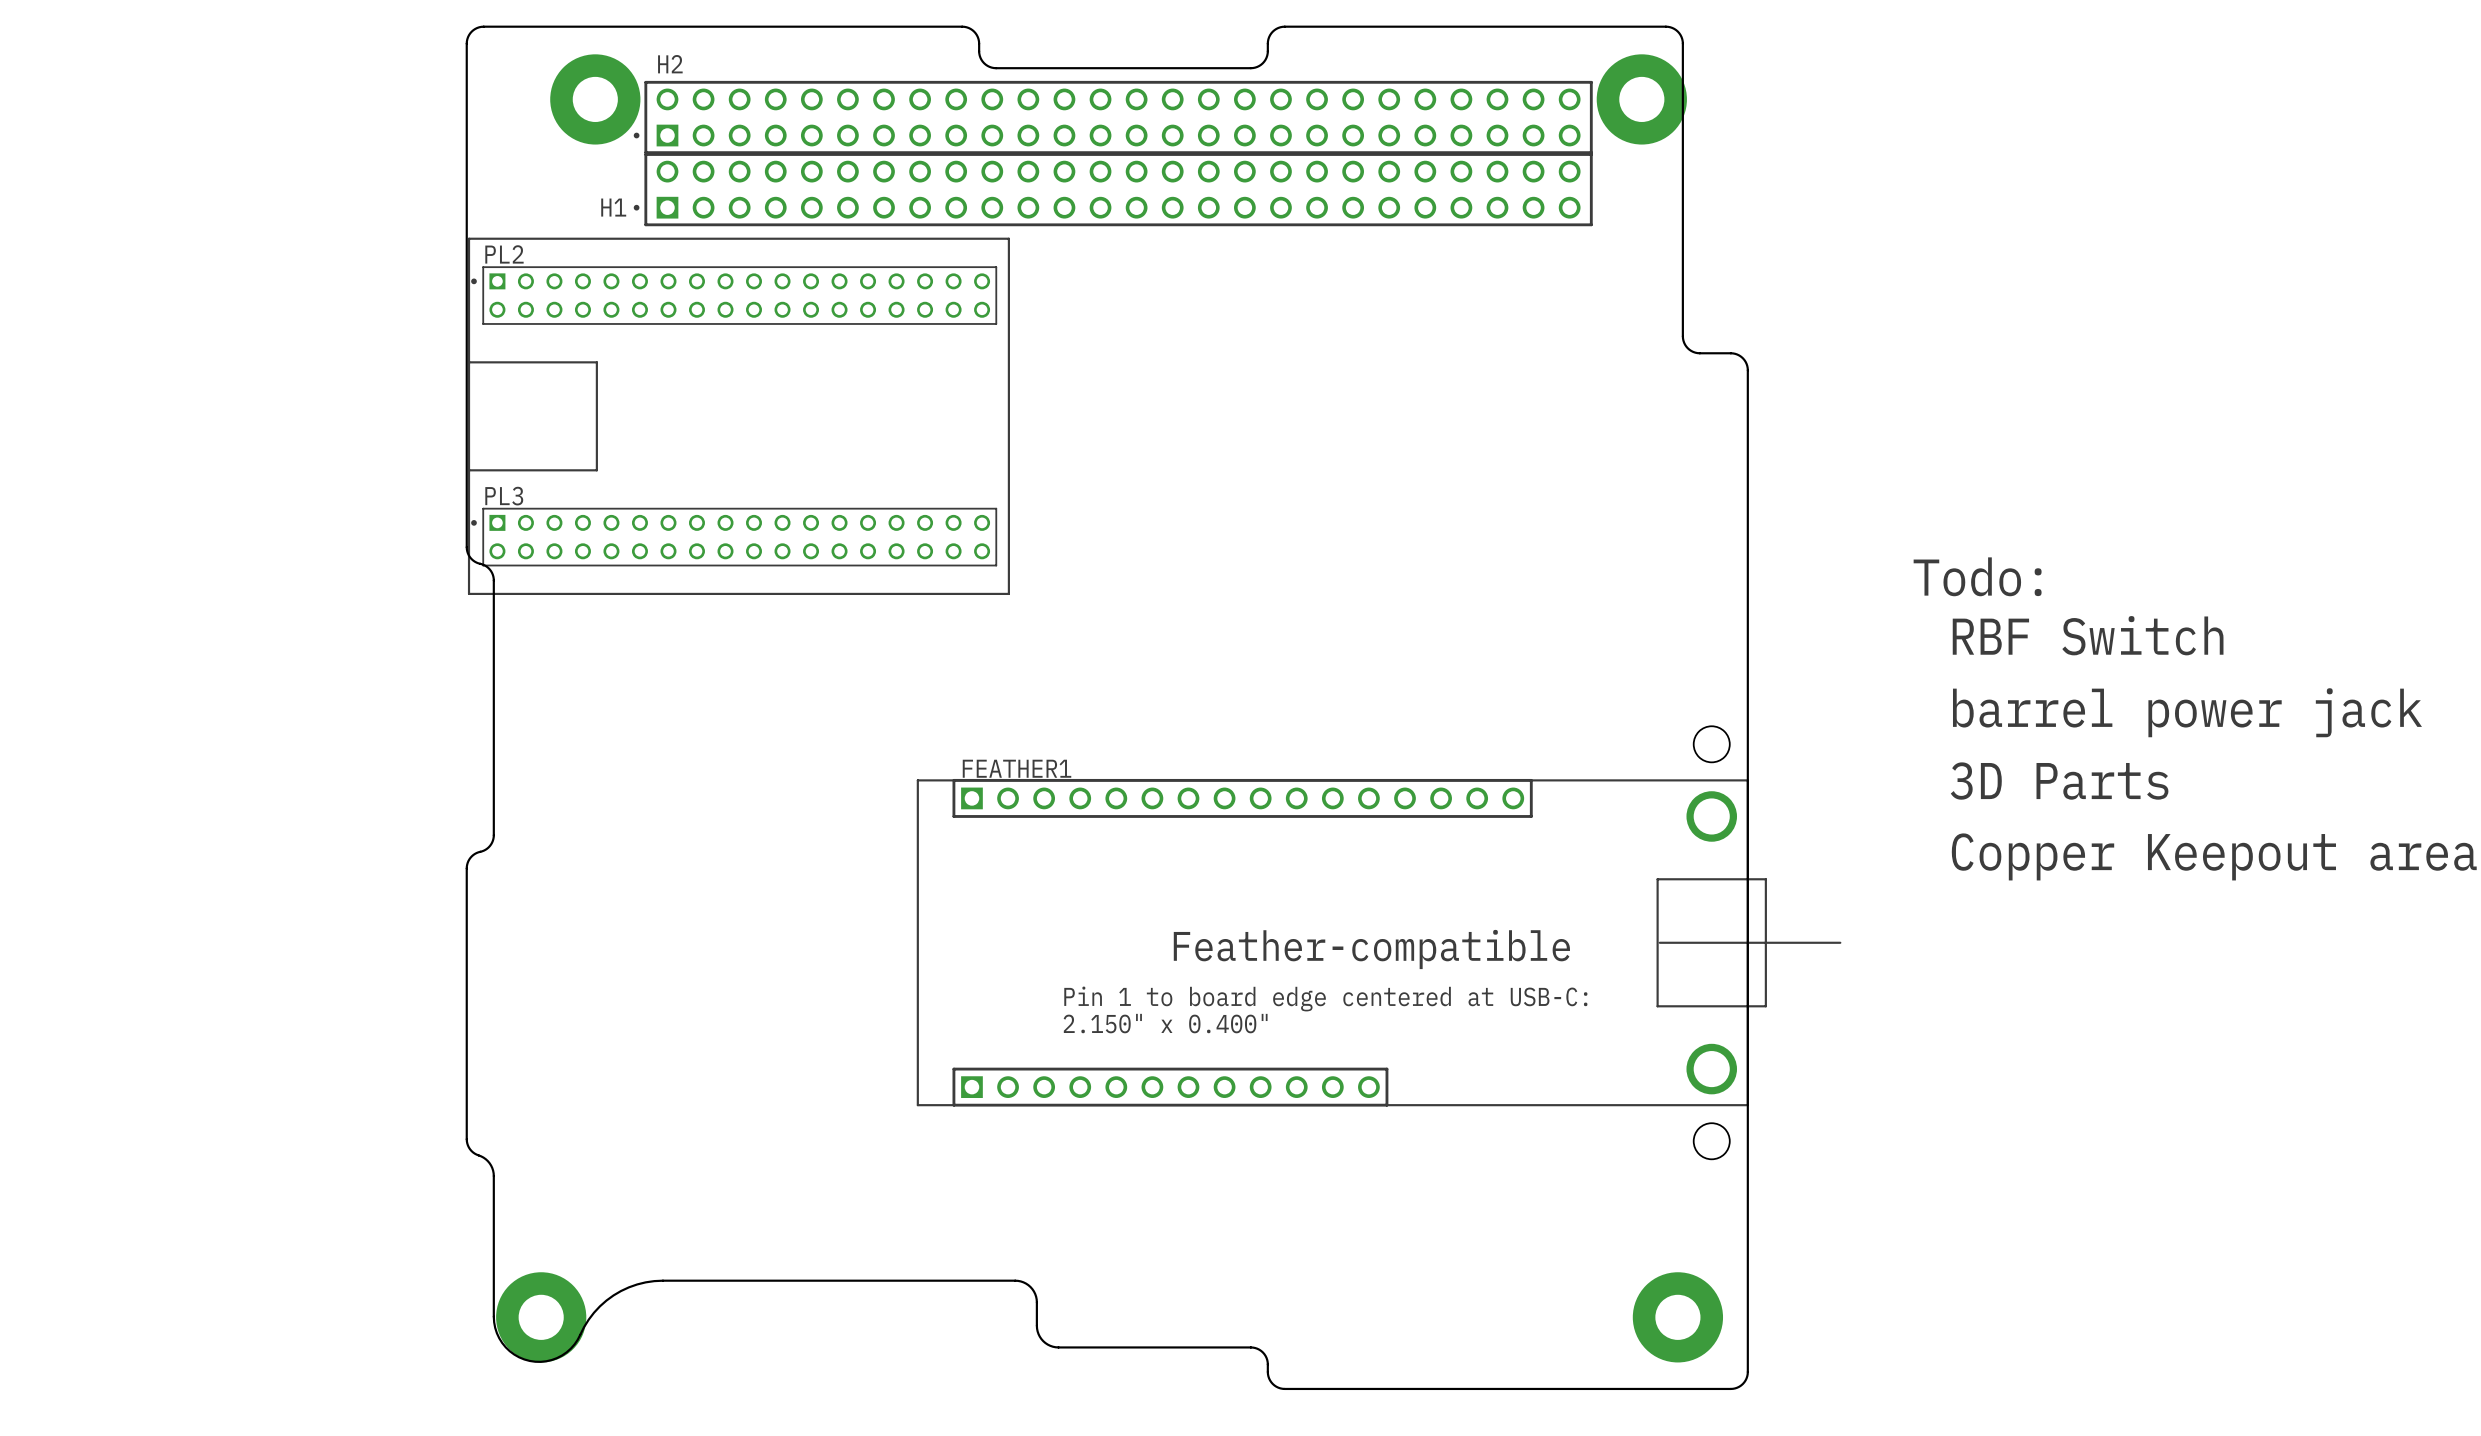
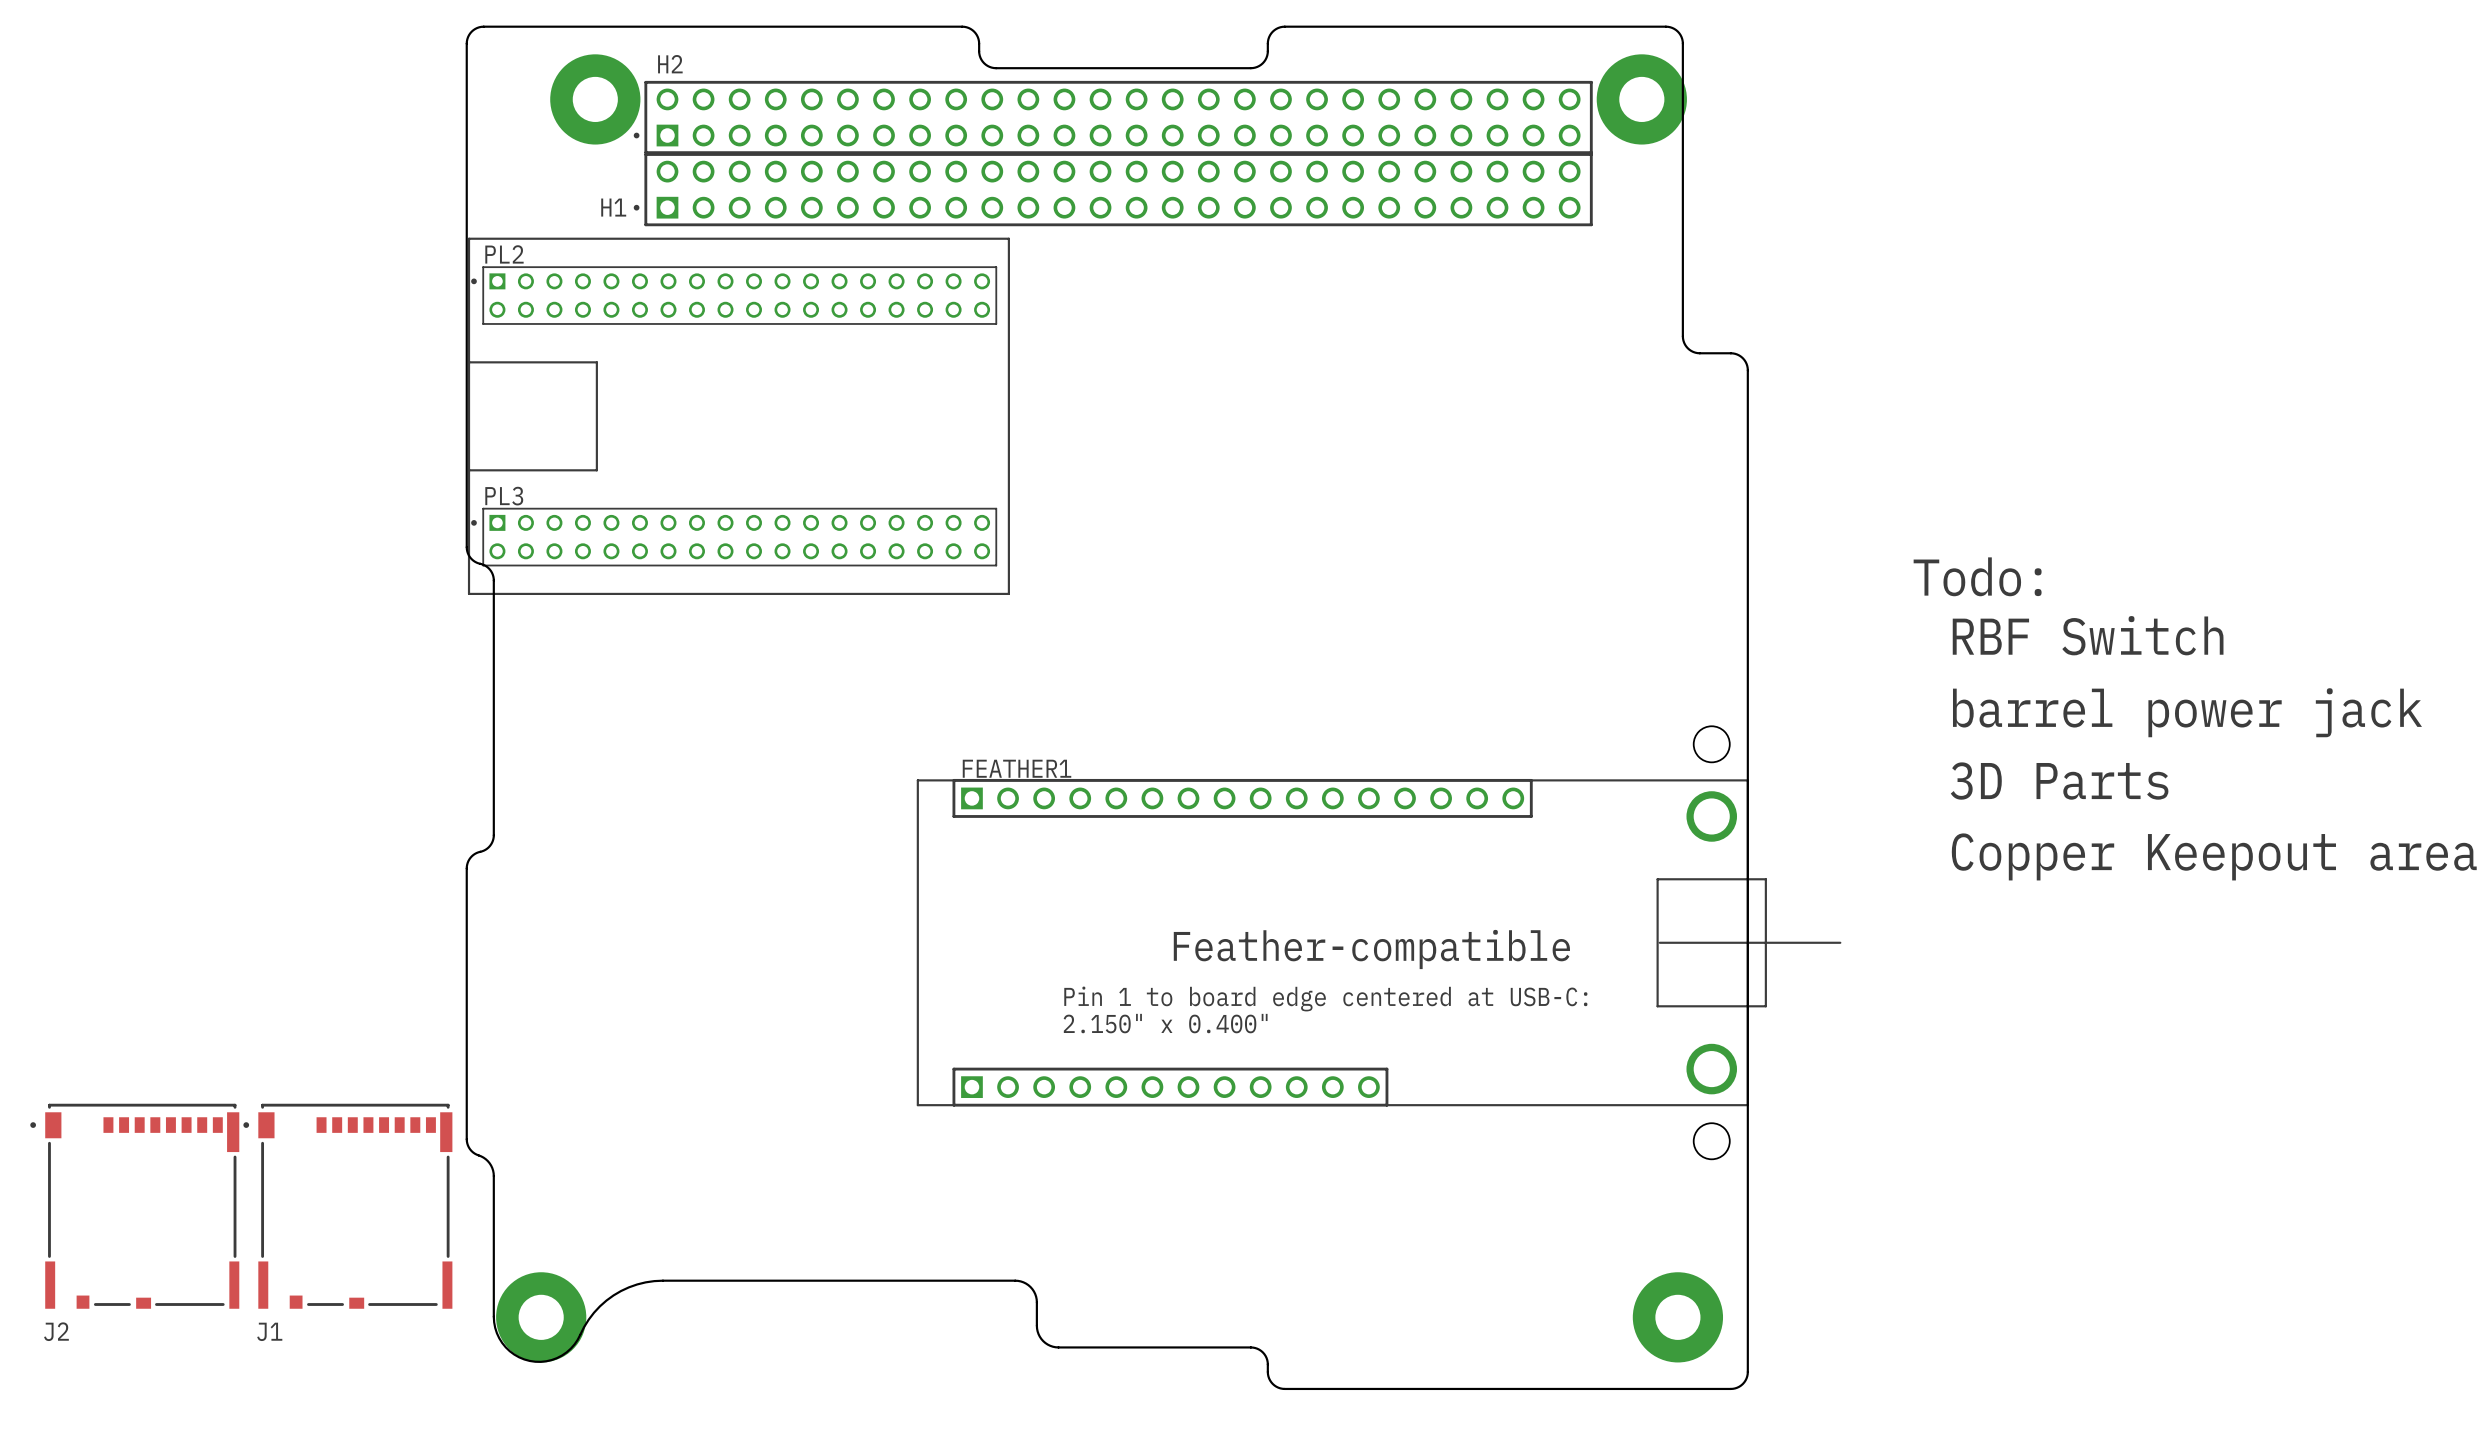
J2: none -> (134, 1206)
J1: none -> (347, 1206)

